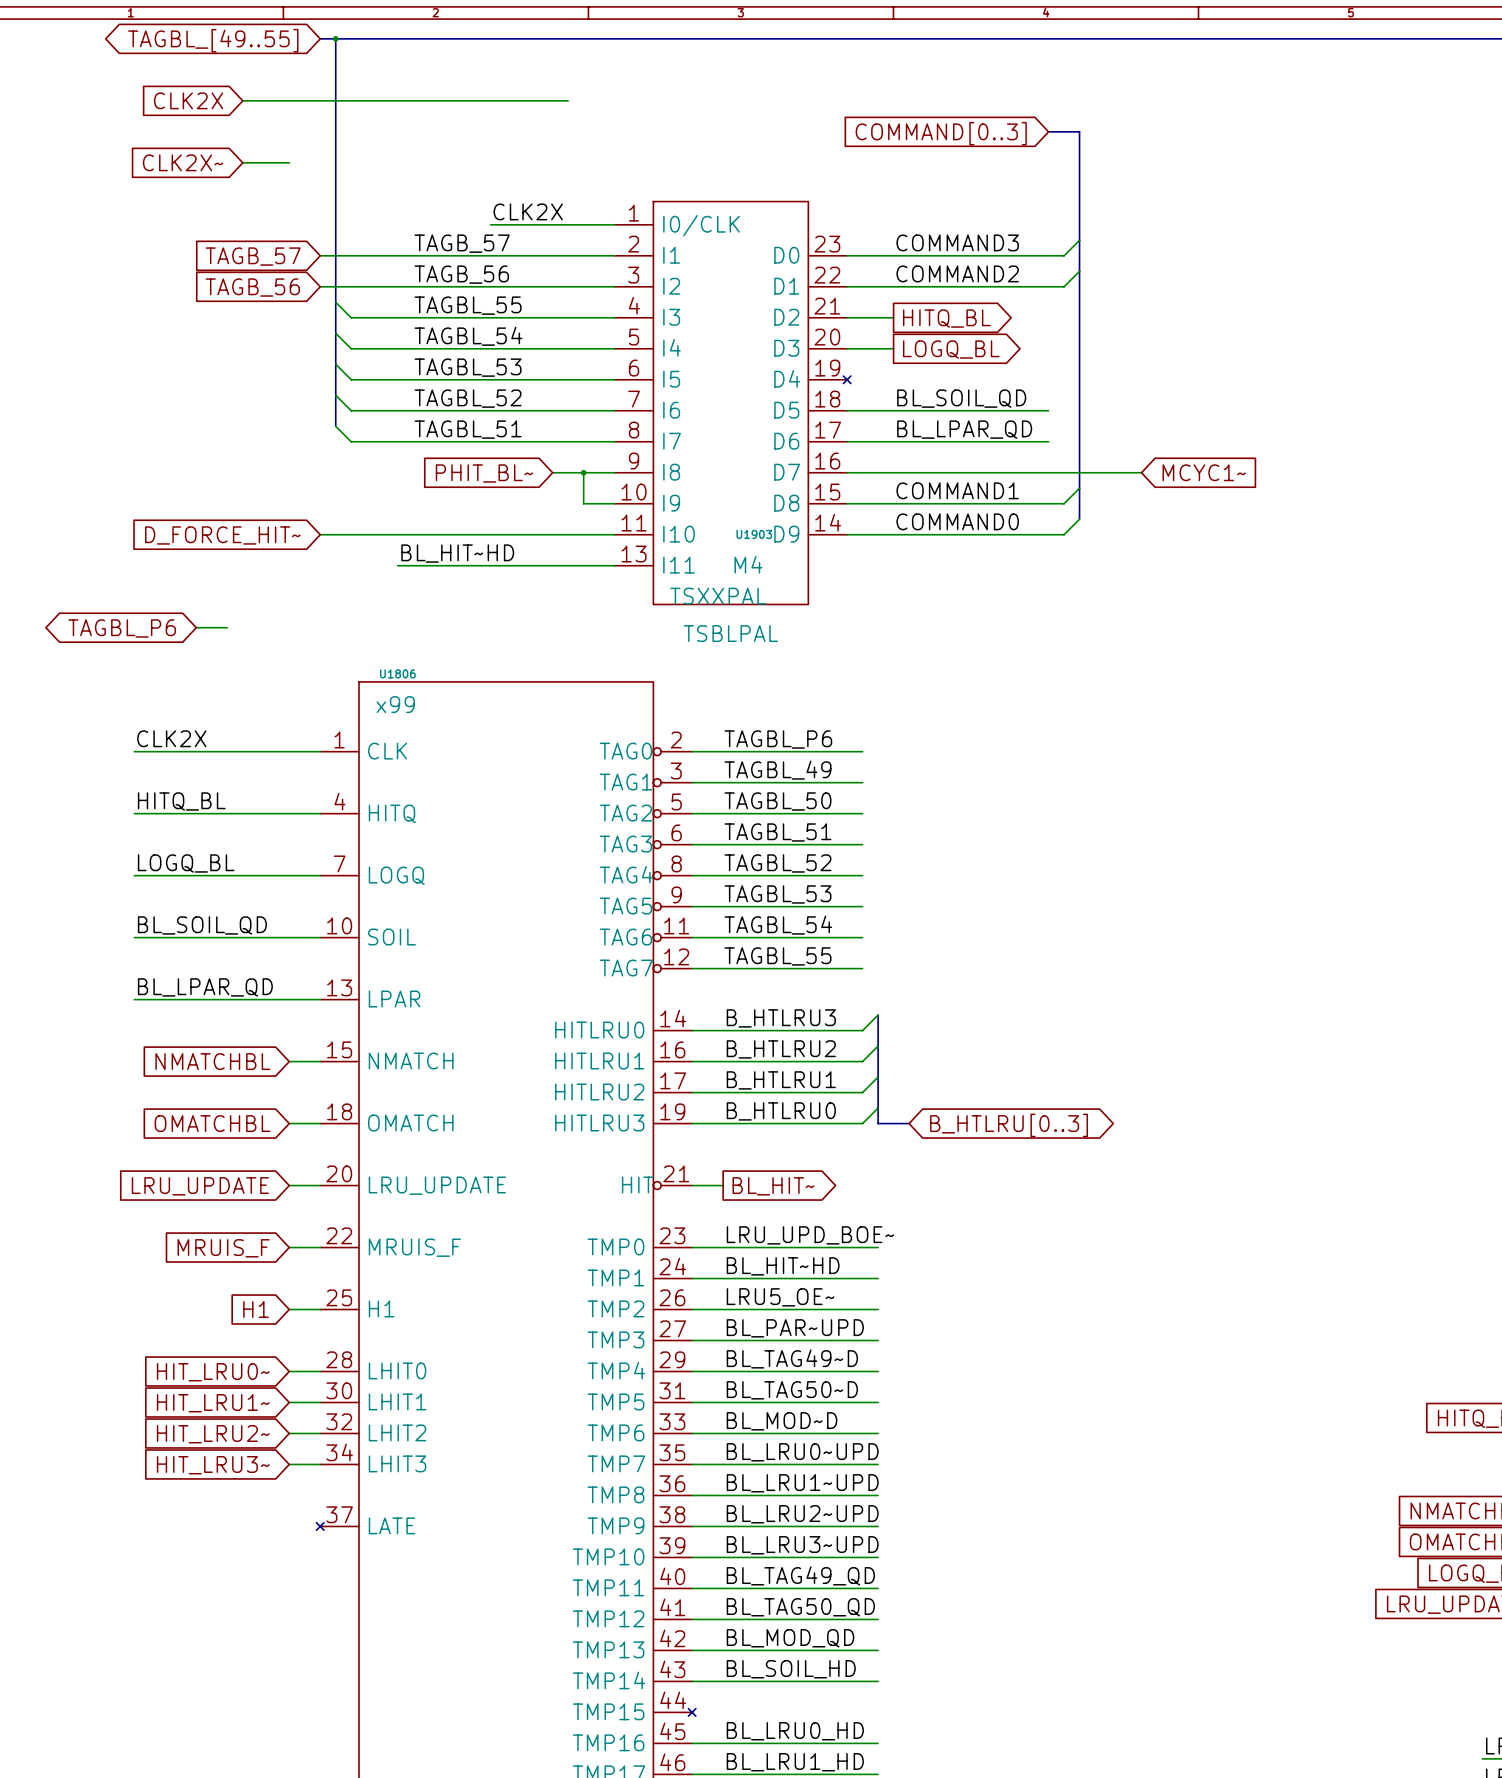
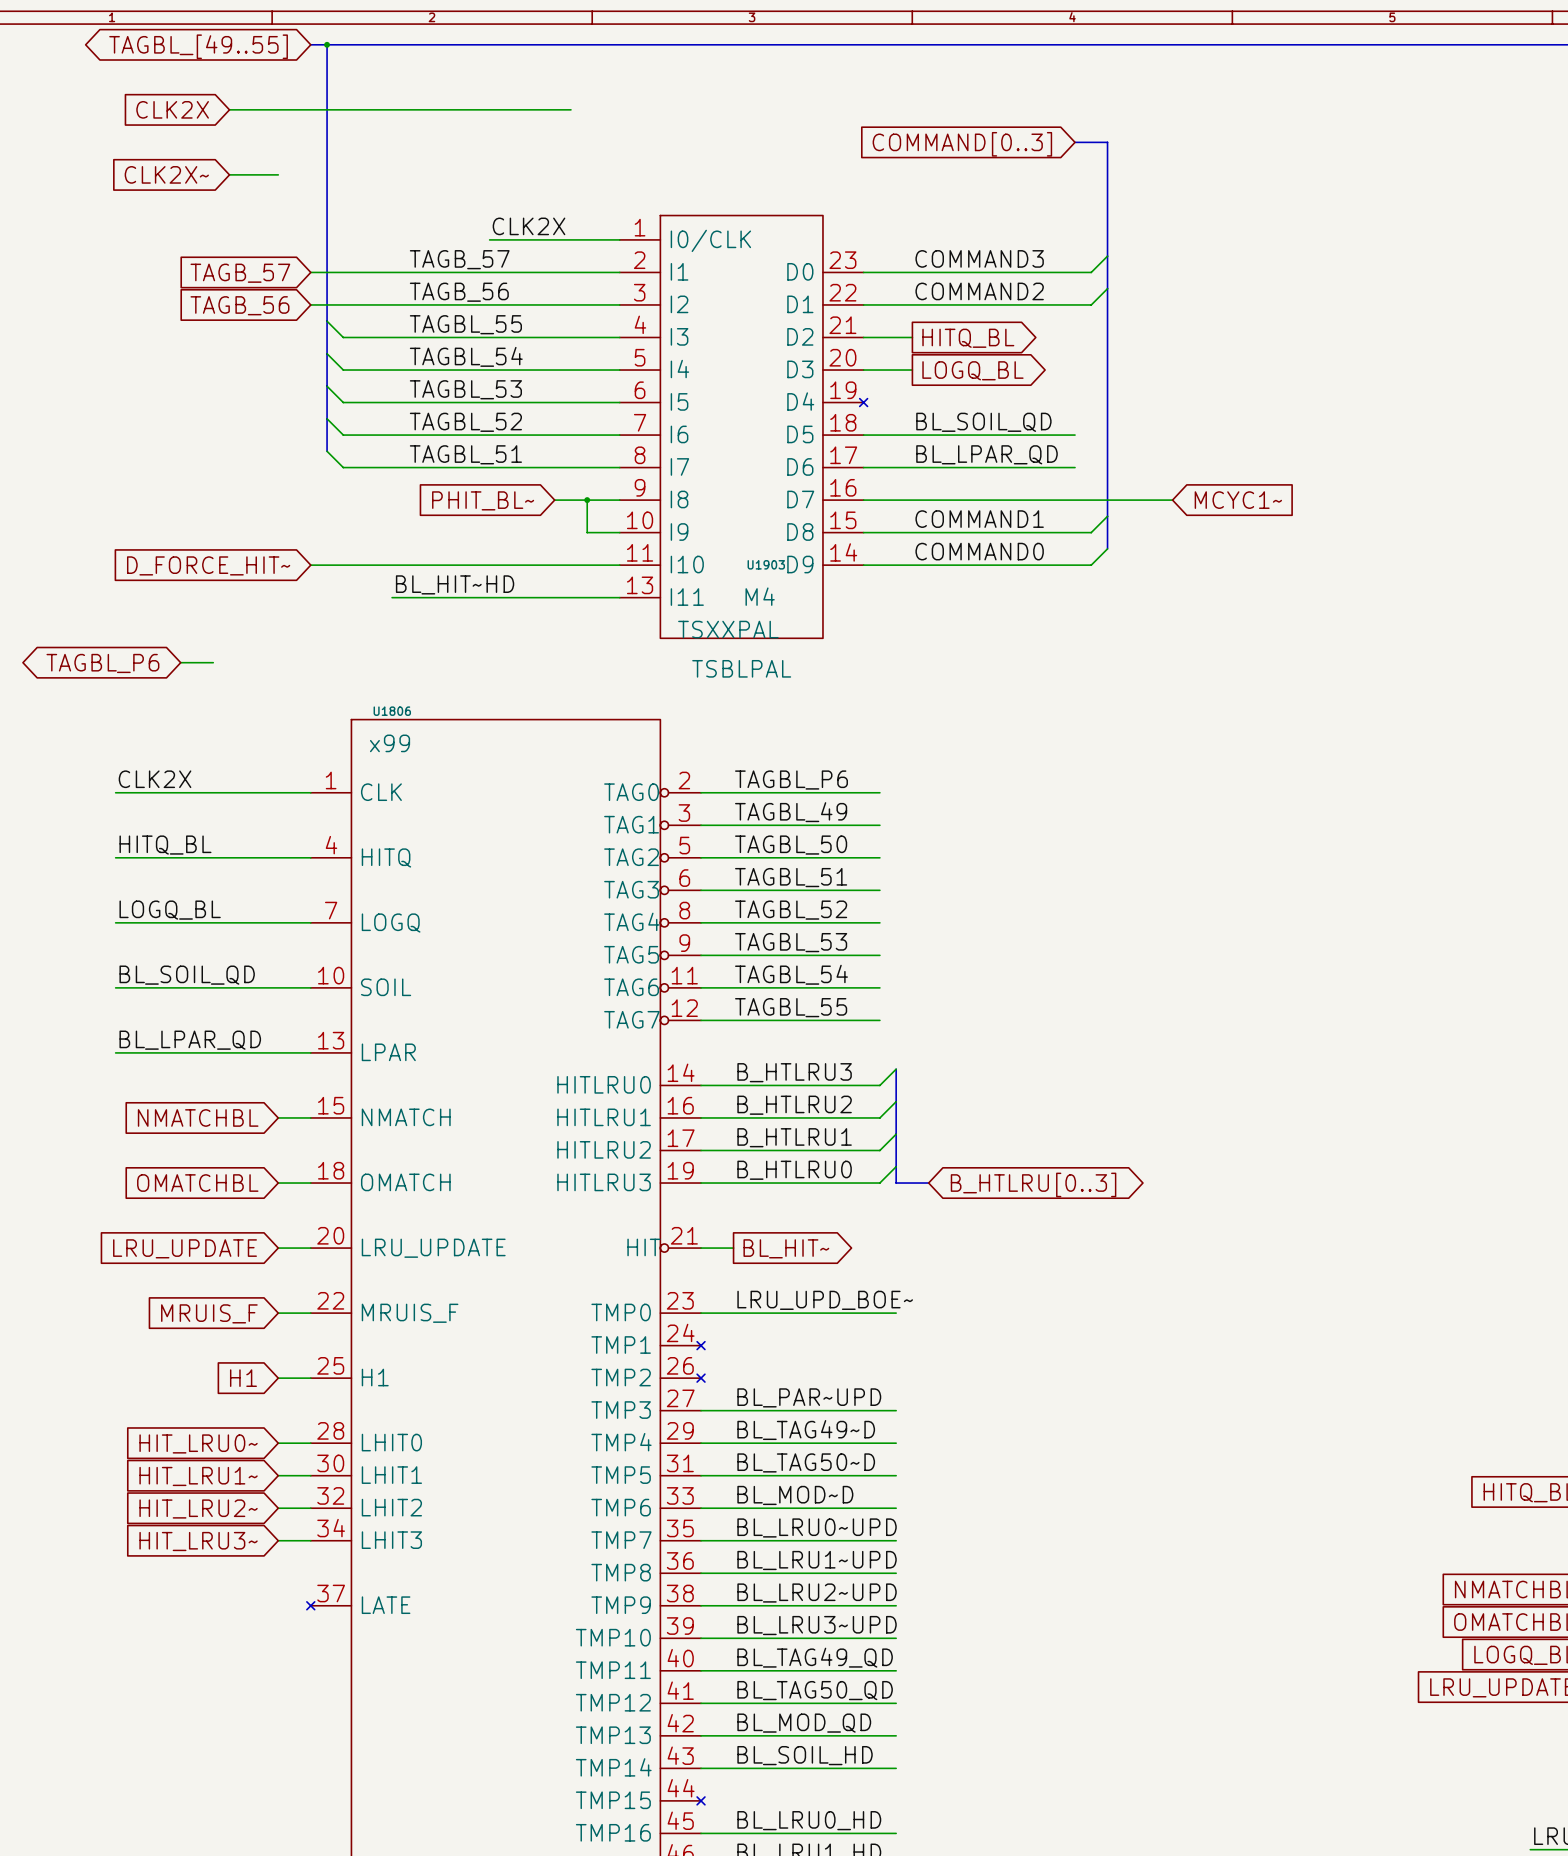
label: BL_HIT~HD (783, 1266) -> none
wire: (692, 1278) (878, 1278) -> none
no-connect mark: none -> (701, 1345)
label: LRU5_OE~ (780, 1297) -> none
wire: (692, 1309) (878, 1309) -> none
no-connect mark: none -> (701, 1378)

